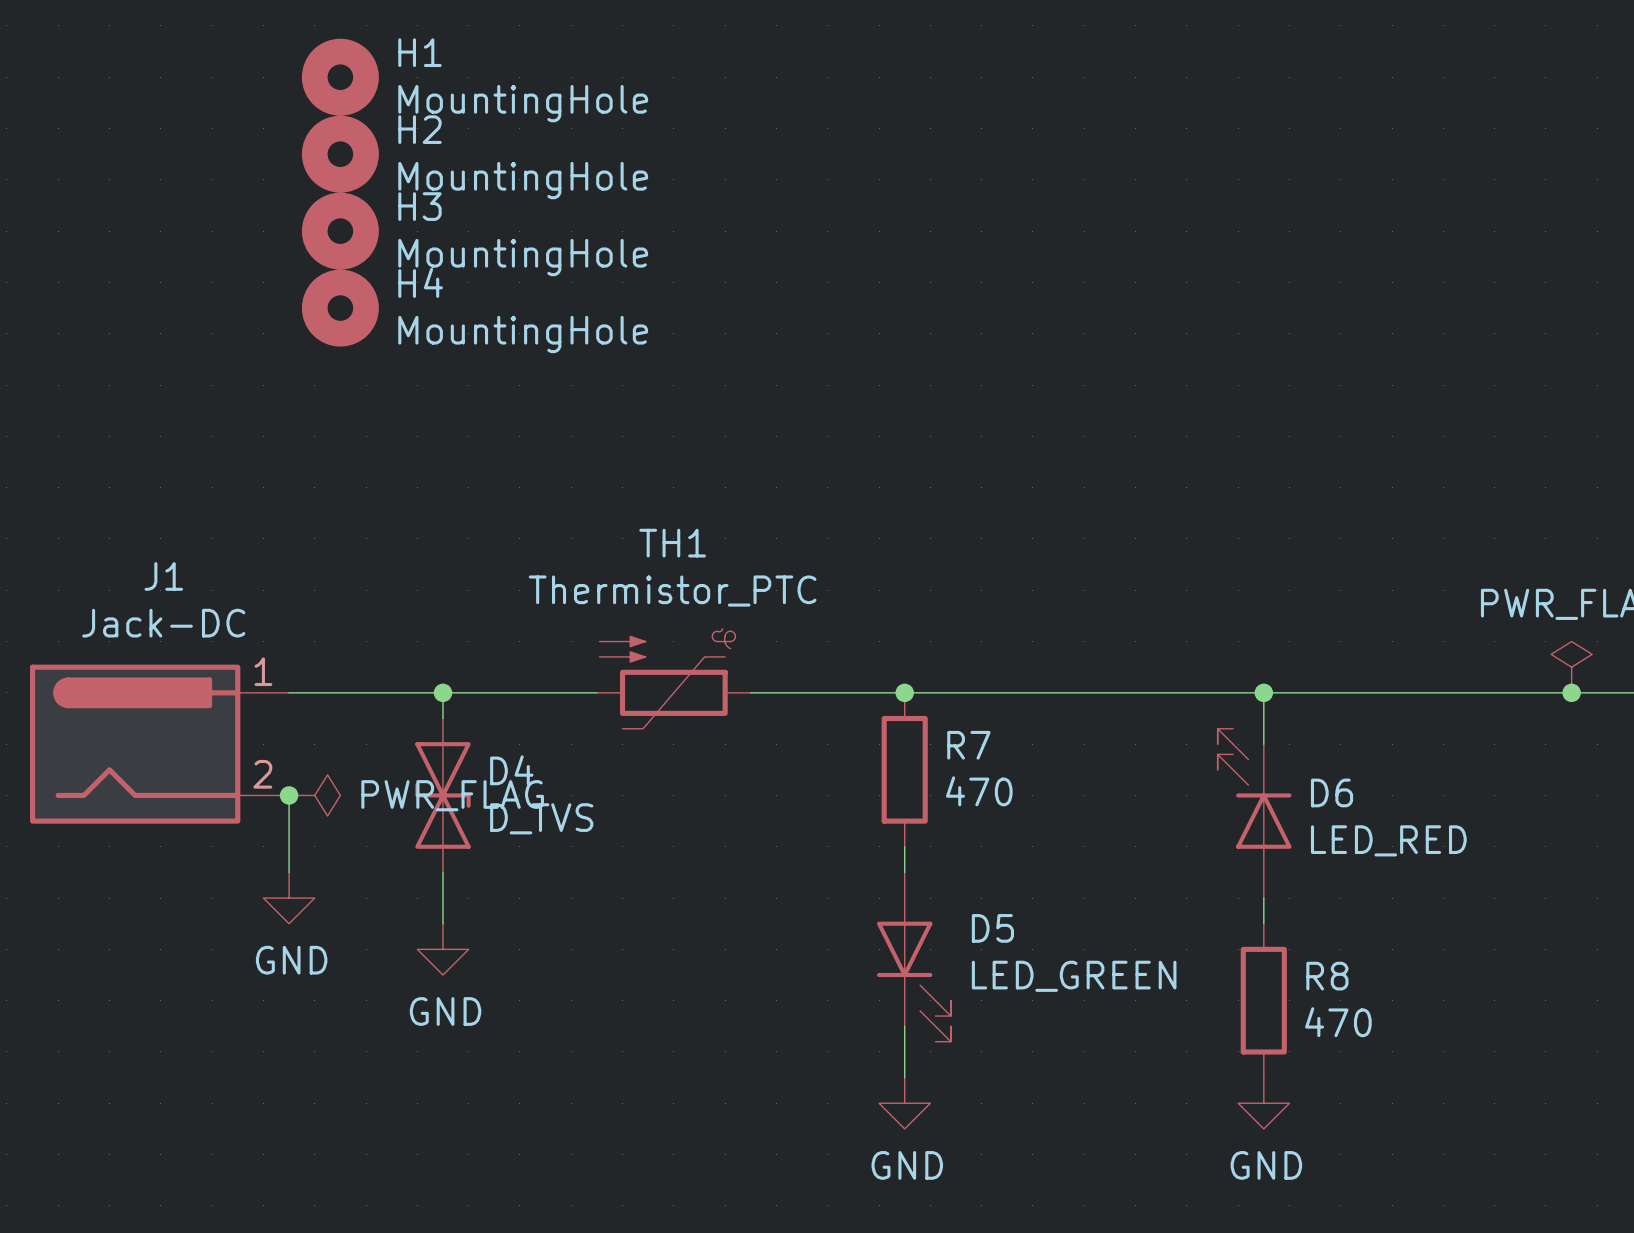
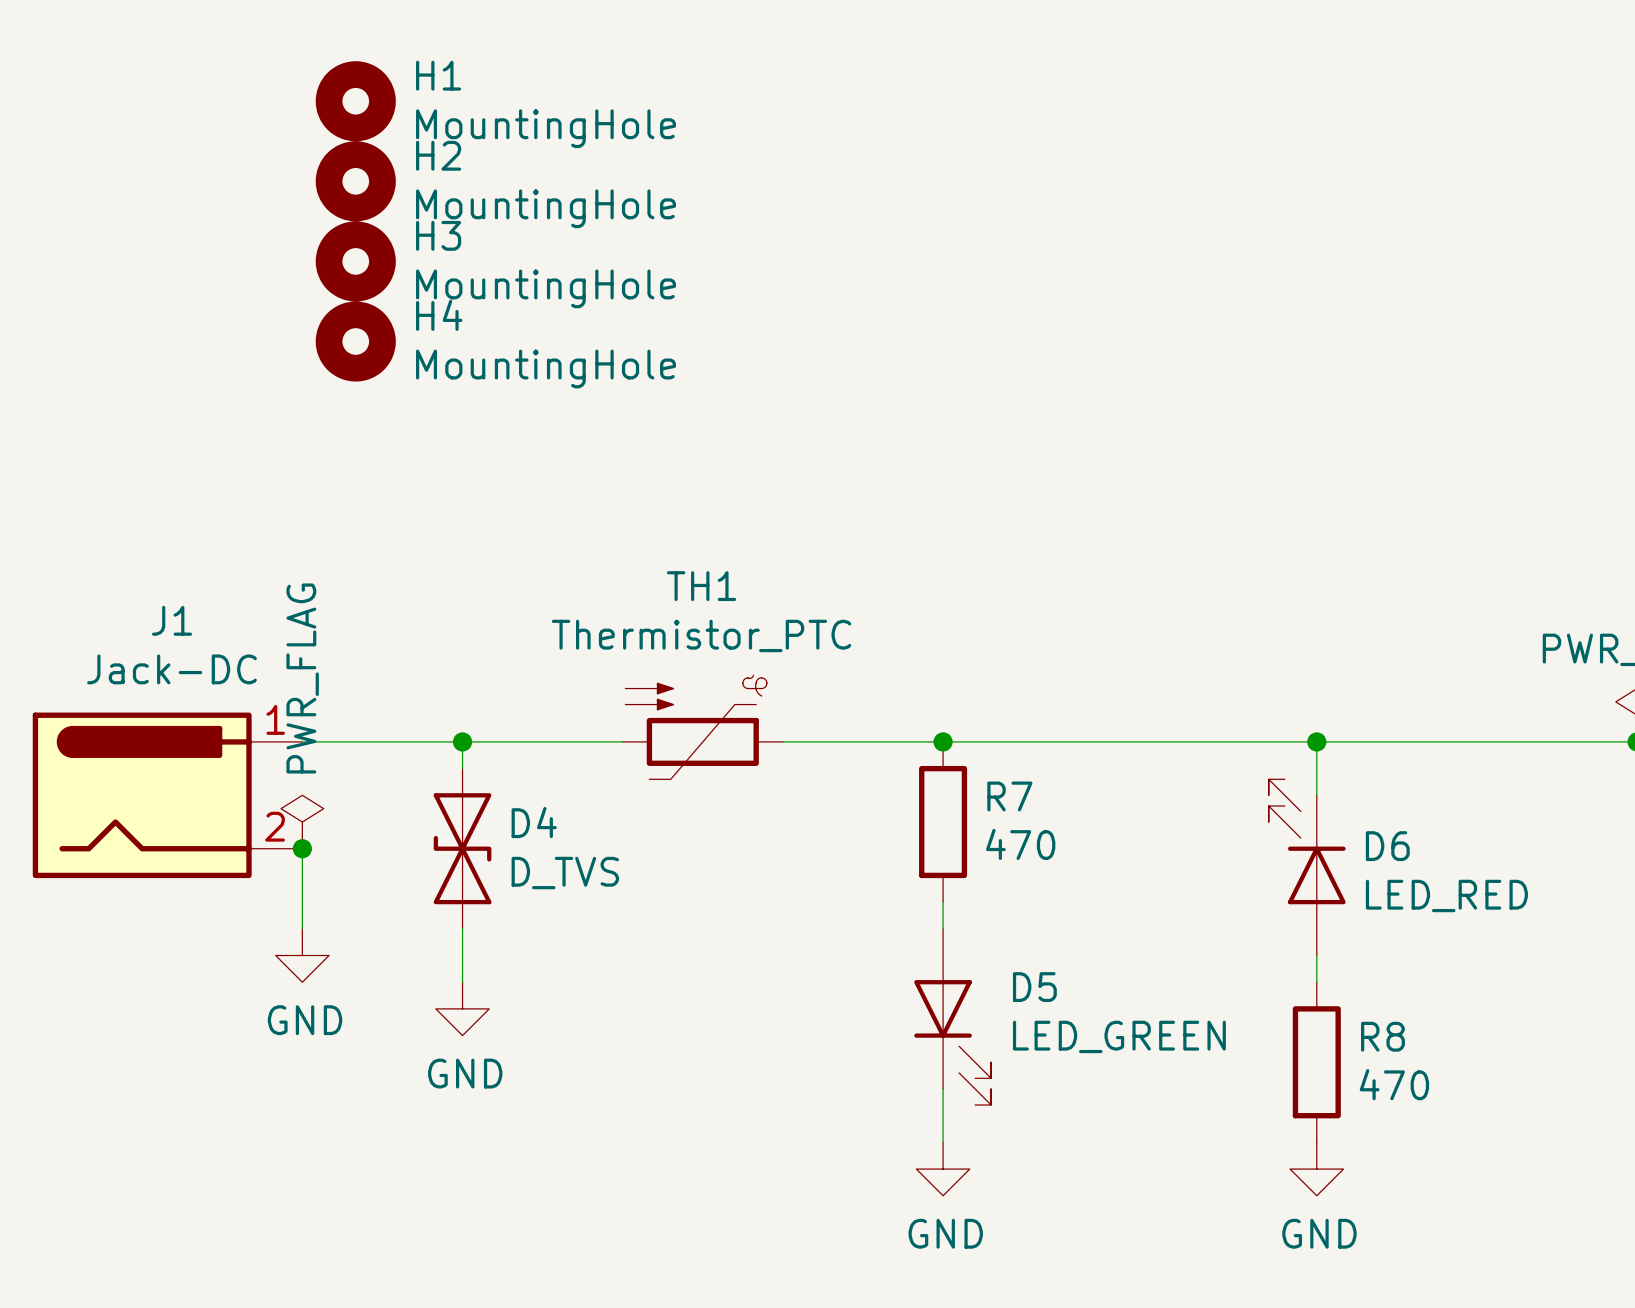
power symbol rotation: 0° (314, 795) -> 90° counterclockwise (302, 822)
power symbol position: PWR_FLAG (314, 795) -> PWR_FLAG (302, 822)

